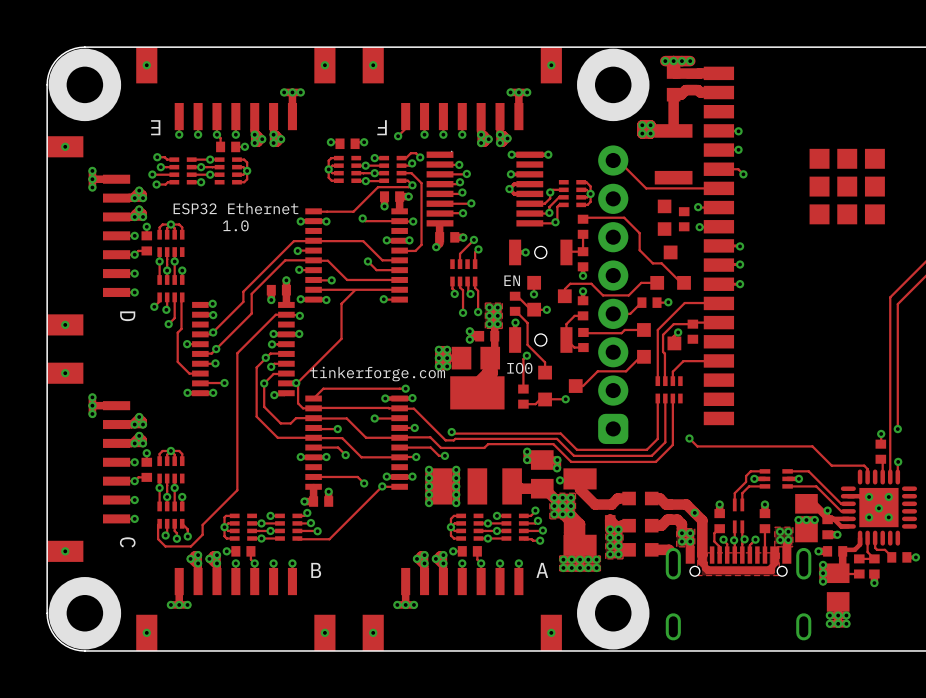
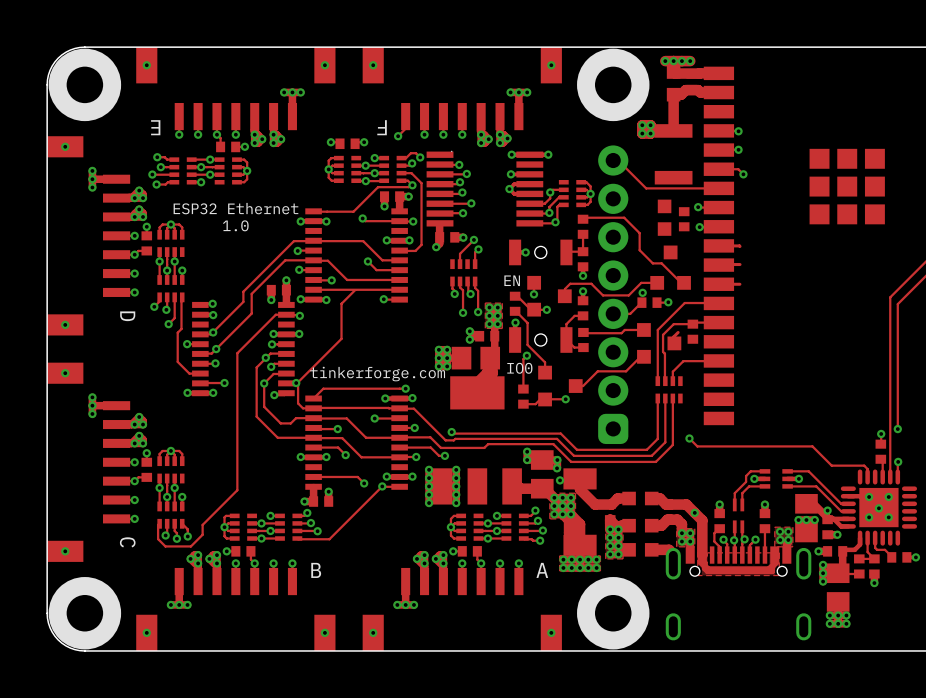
via: (740, 246) -> none
via: (740, 264) -> none
via: (740, 284) -> none
via: none -> (642, 292)
via: (678, 332) -> none

